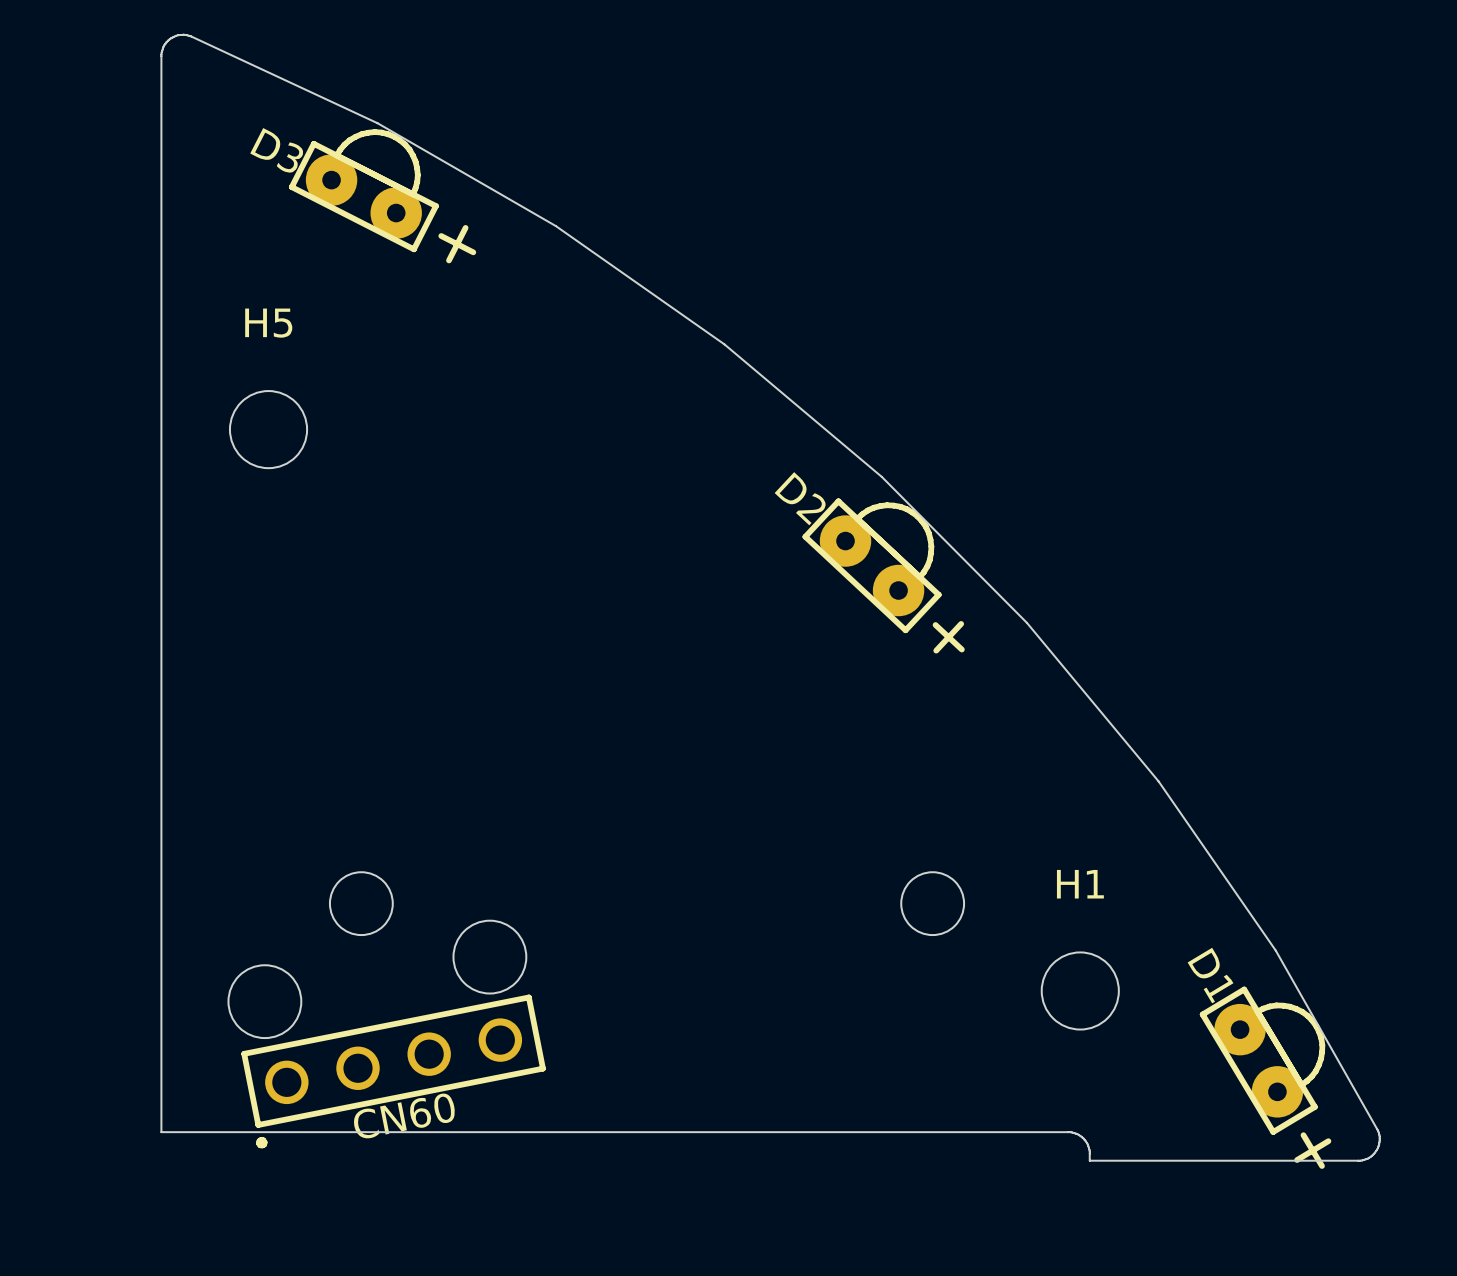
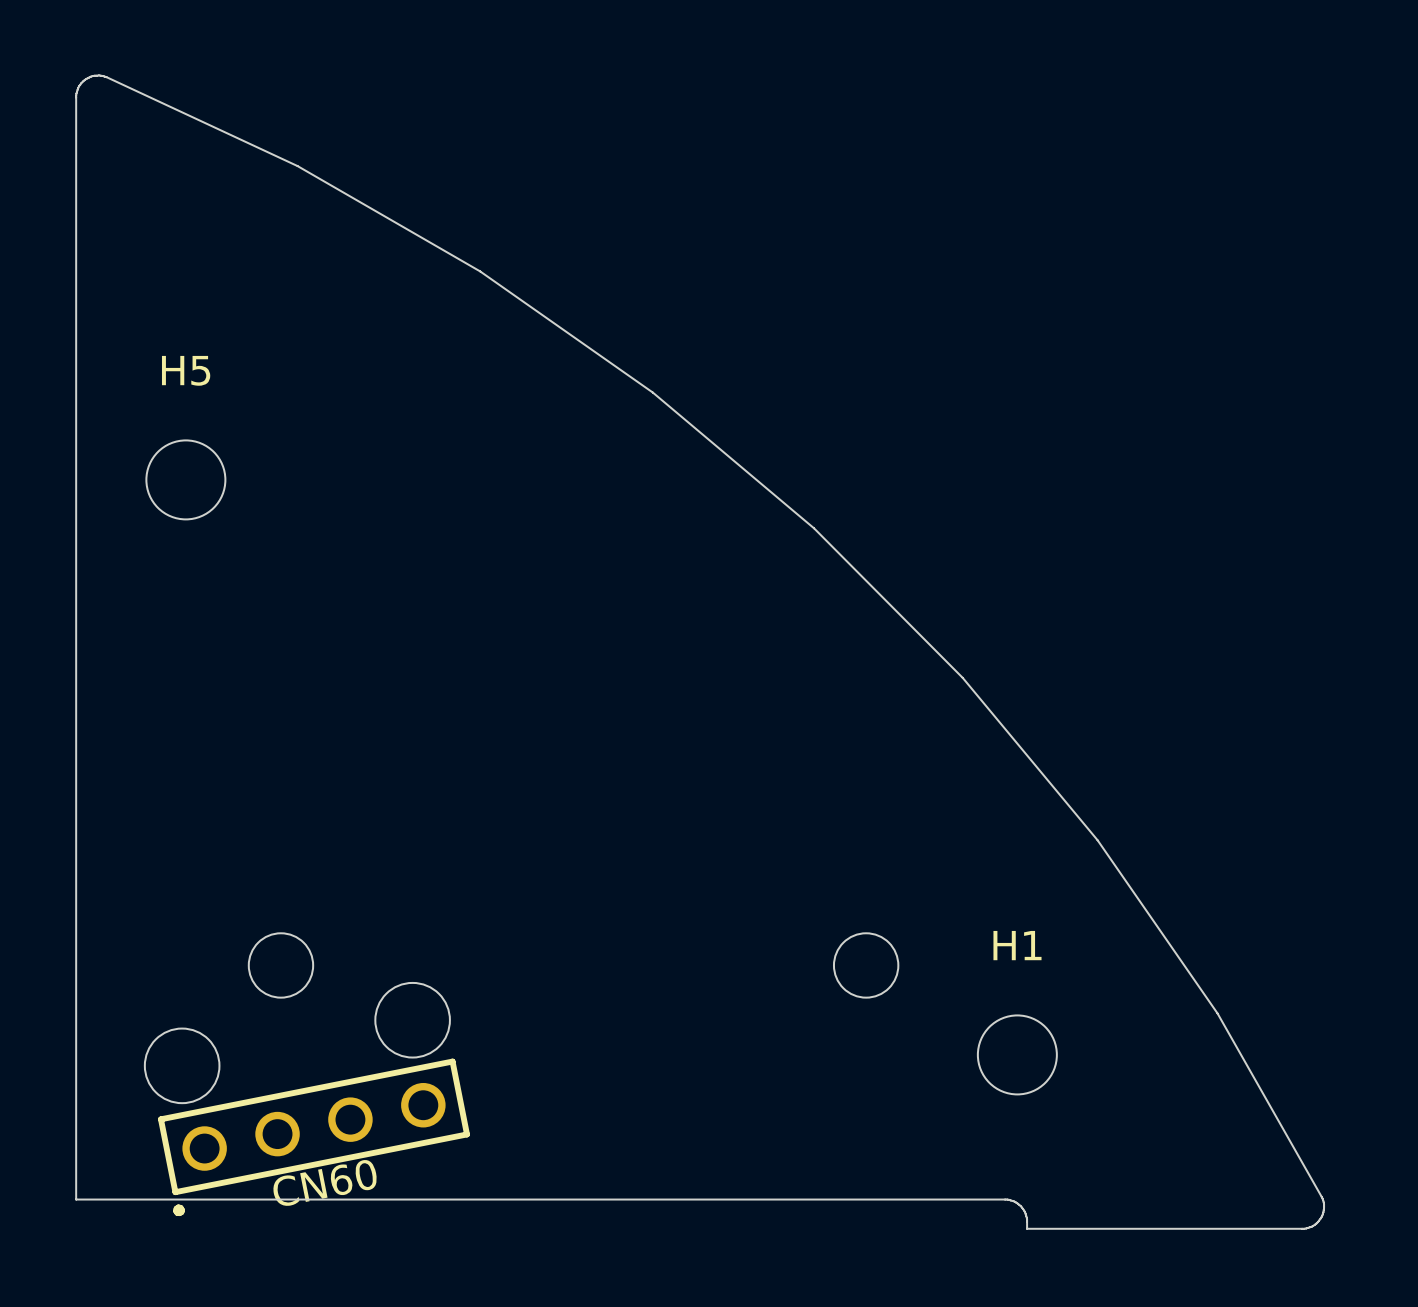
D3: (382, 196) -> none
D2: (883, 575) -> none
D1: (1265, 1077) -> none

